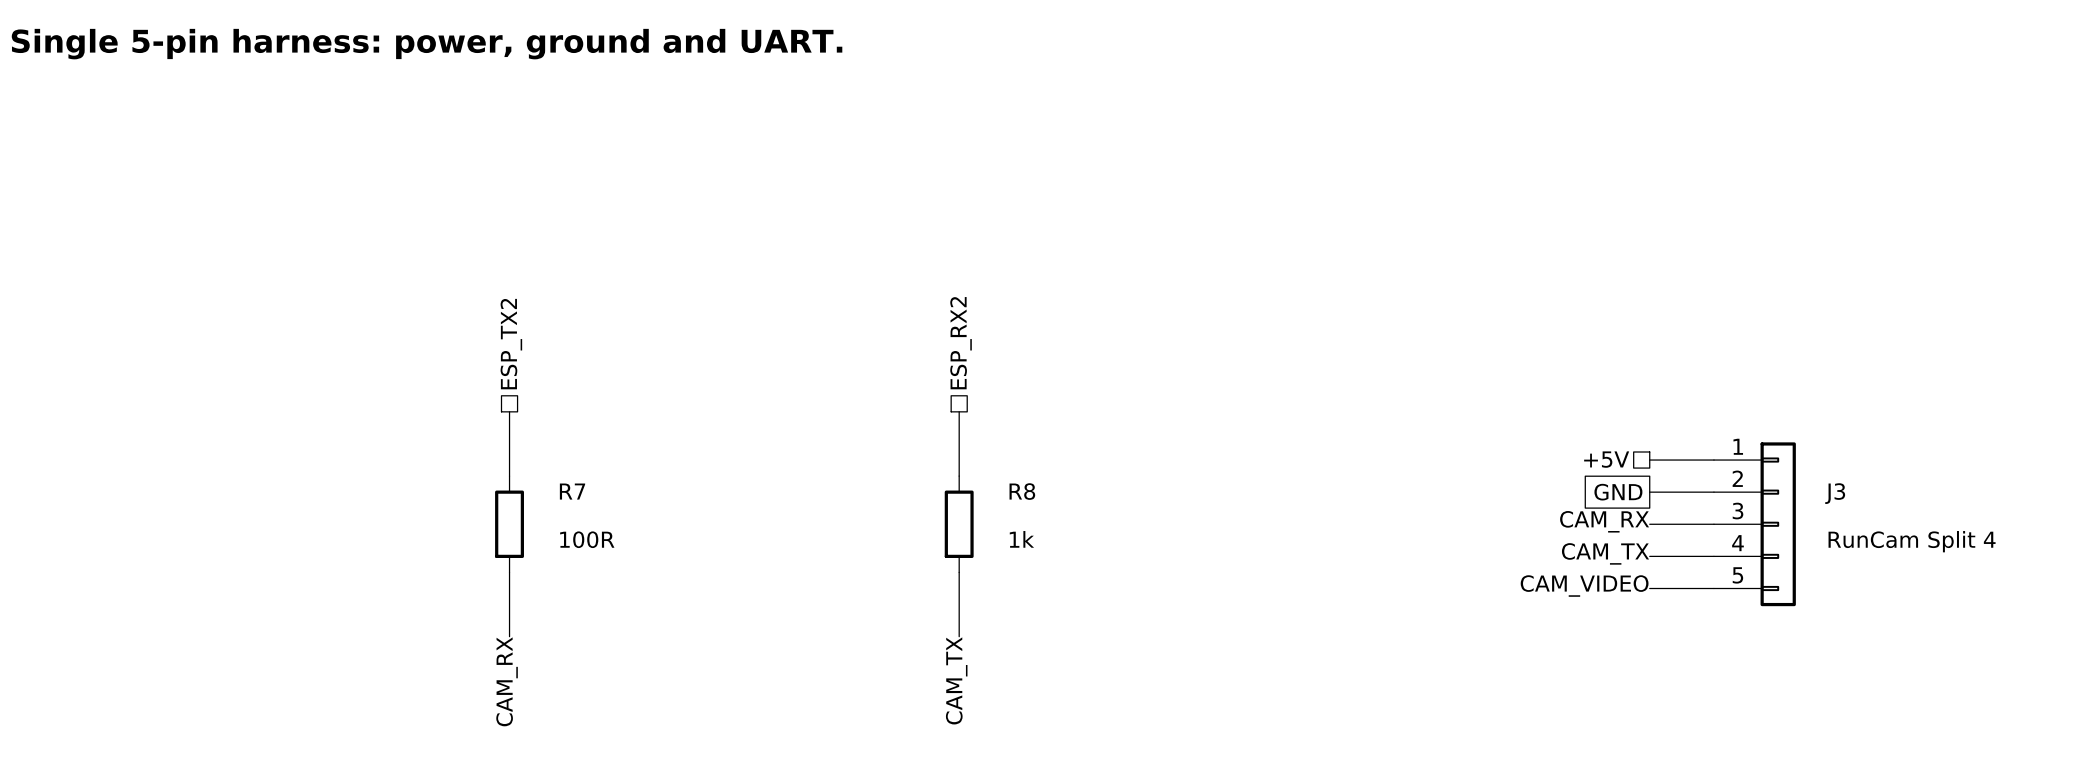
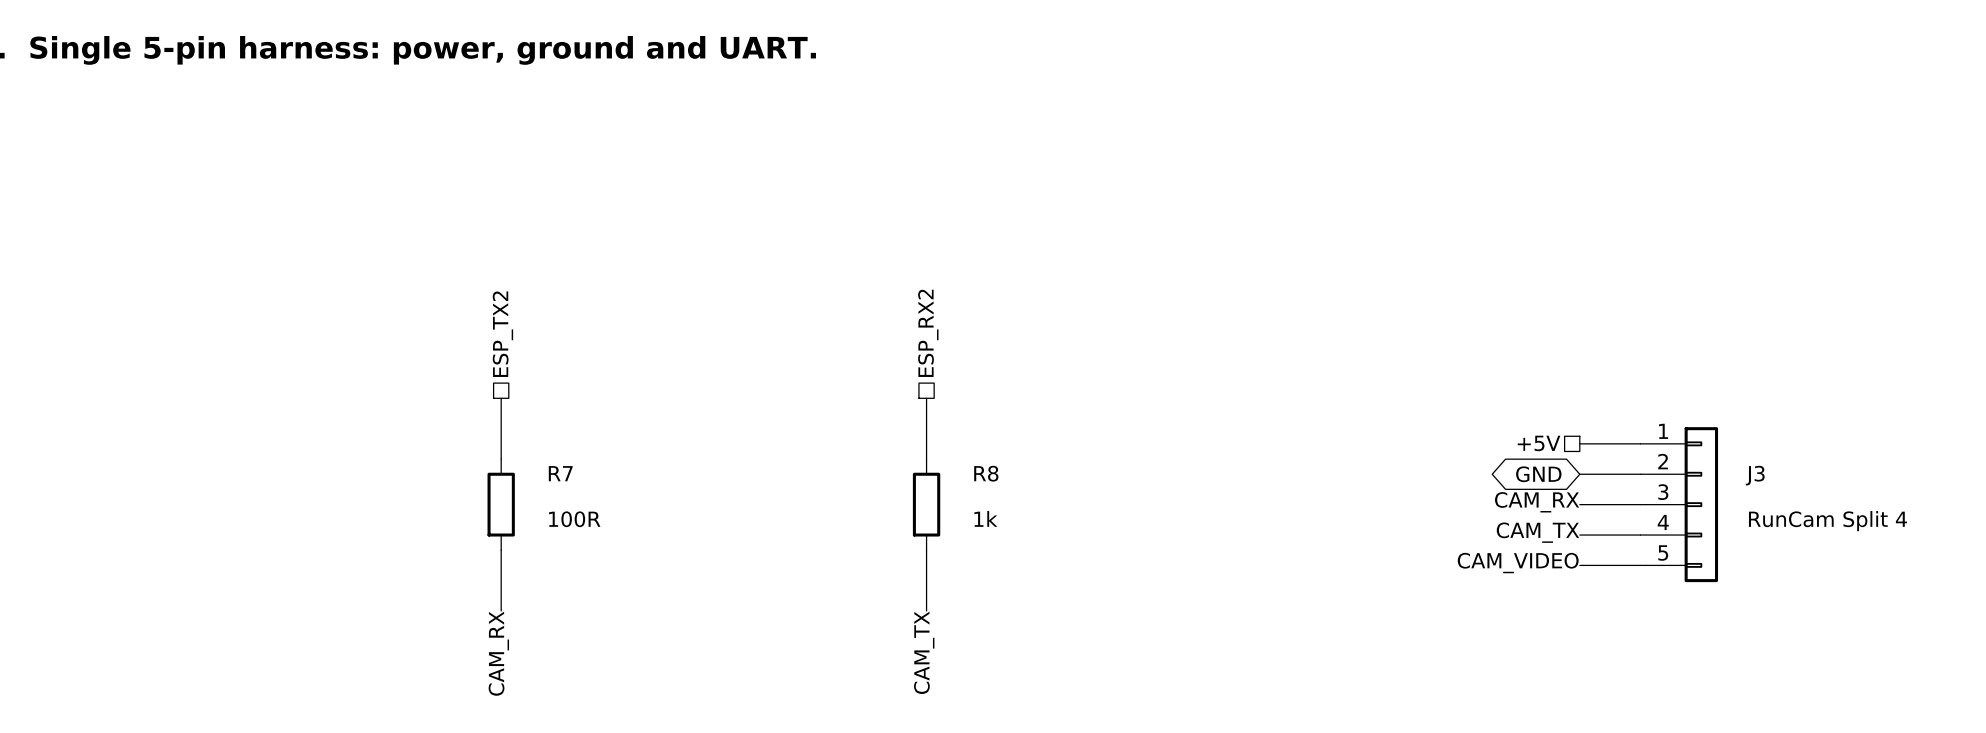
global label shape: passive (1618, 492) -> bidirectional (1538, 474)

